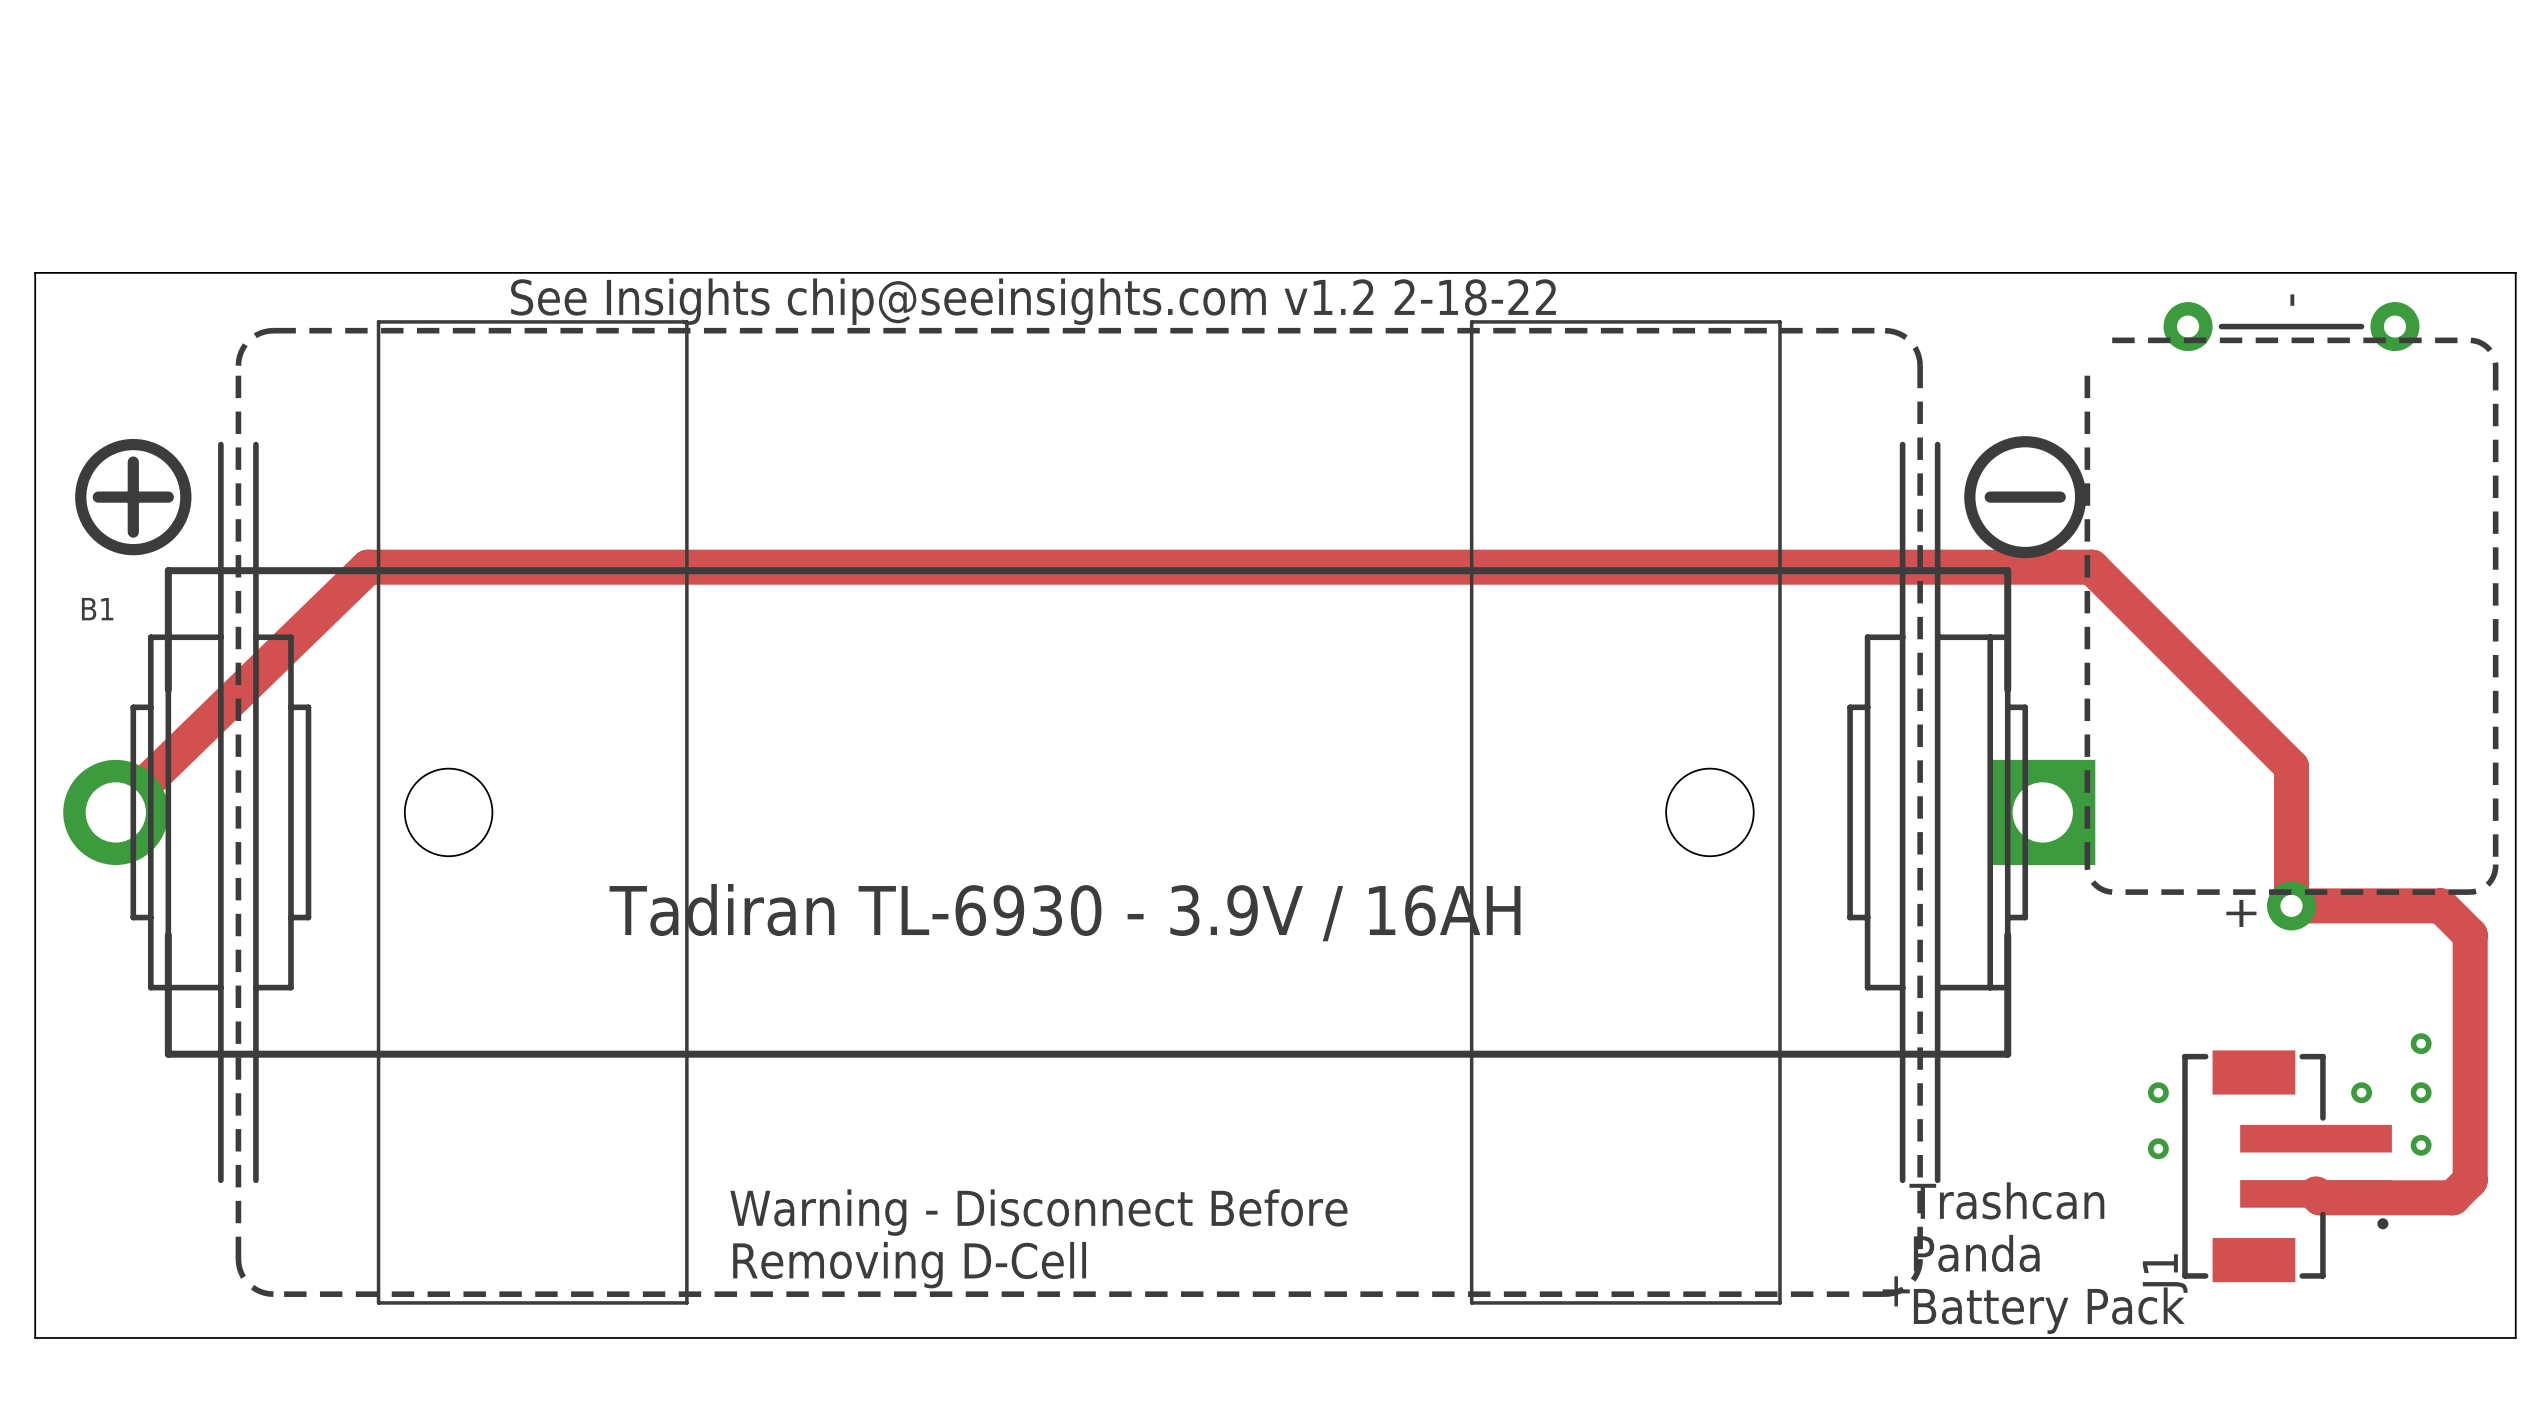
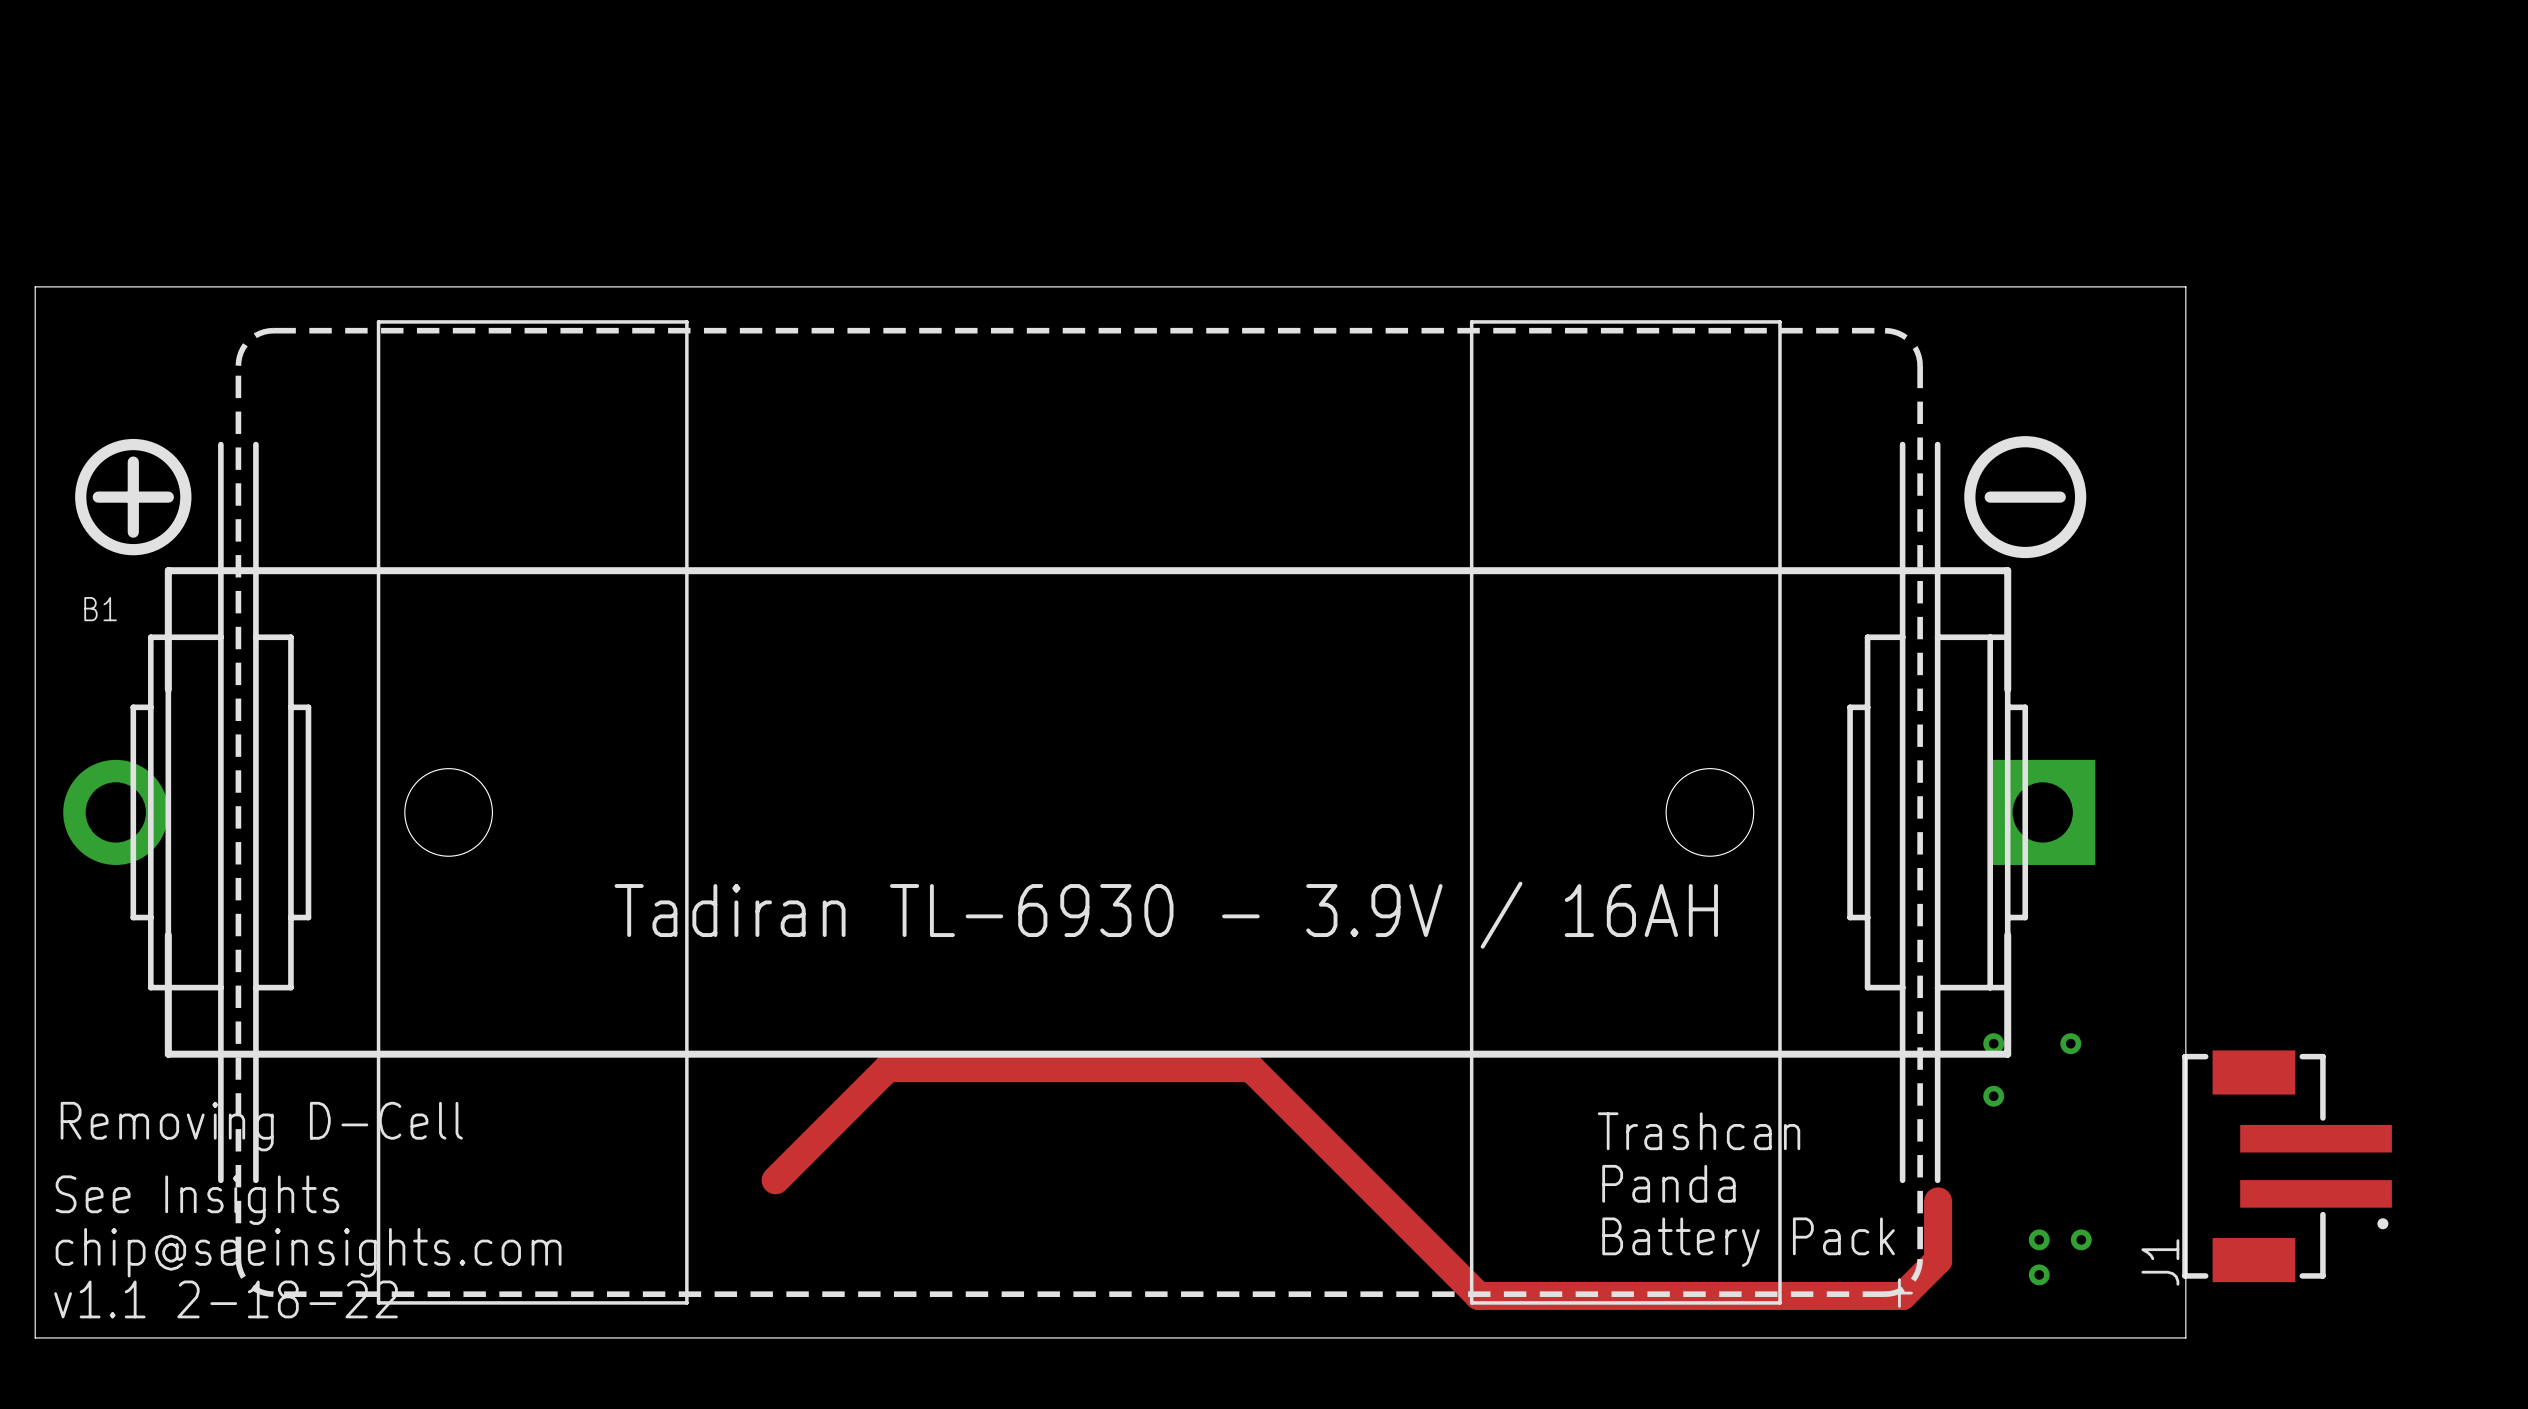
board edge: (35, 286) (35, 272) (2515, 272) (2515, 1337) (2185, 1337) -> (35, 286) (2185, 286) (2185, 1337)
text: See Insights chip@seeinsights.com v1.2 2-18-22 (1033, 301) -> none
part: (2291, 616) -> none
track: (115, 812) (368, 567) (2091, 567) (2291, 766) (2291, 905) (2441, 905) (2470, 935) (2470, 1180) (2452, 1197) (2319, 1197) (2316, 1193) -> none
via: none -> (1993, 1043)
via: none -> (2070, 1043)
via: (2421, 1043) -> none
via: (2158, 1092) -> none
via: (2361, 1092) -> none
via: (2421, 1092) -> none
via: none -> (1993, 1096)
text: none -> Removing D-Cell (261, 1126)
via: (2421, 1145) -> none
via: (2158, 1148) -> none
track: none -> (775, 1180) (887, 1068) (1250, 1068) (1478, 1295) (1902, 1295) (1938, 1260) (1938, 1201)
text: none -> See Insights (197, 1200)
text position: Trashcan (2006, 1200) -> Trashcan (1698, 1131)
text: Warning - Disconnect Before (1038, 1212) -> none
via: none -> (2039, 1239)
via: none -> (2081, 1239)
text: none -> chip@seeinsights.com (308, 1252)
text position: Panda (1976, 1253) -> Panda (1668, 1183)
text: Removing D-Cell (909, 1265) -> none
via: none -> (2039, 1274)
text: none -> v1.1 2-18-22 (225, 1299)
text position: Battery Pack (2049, 1310) -> Battery Pack (1748, 1242)

